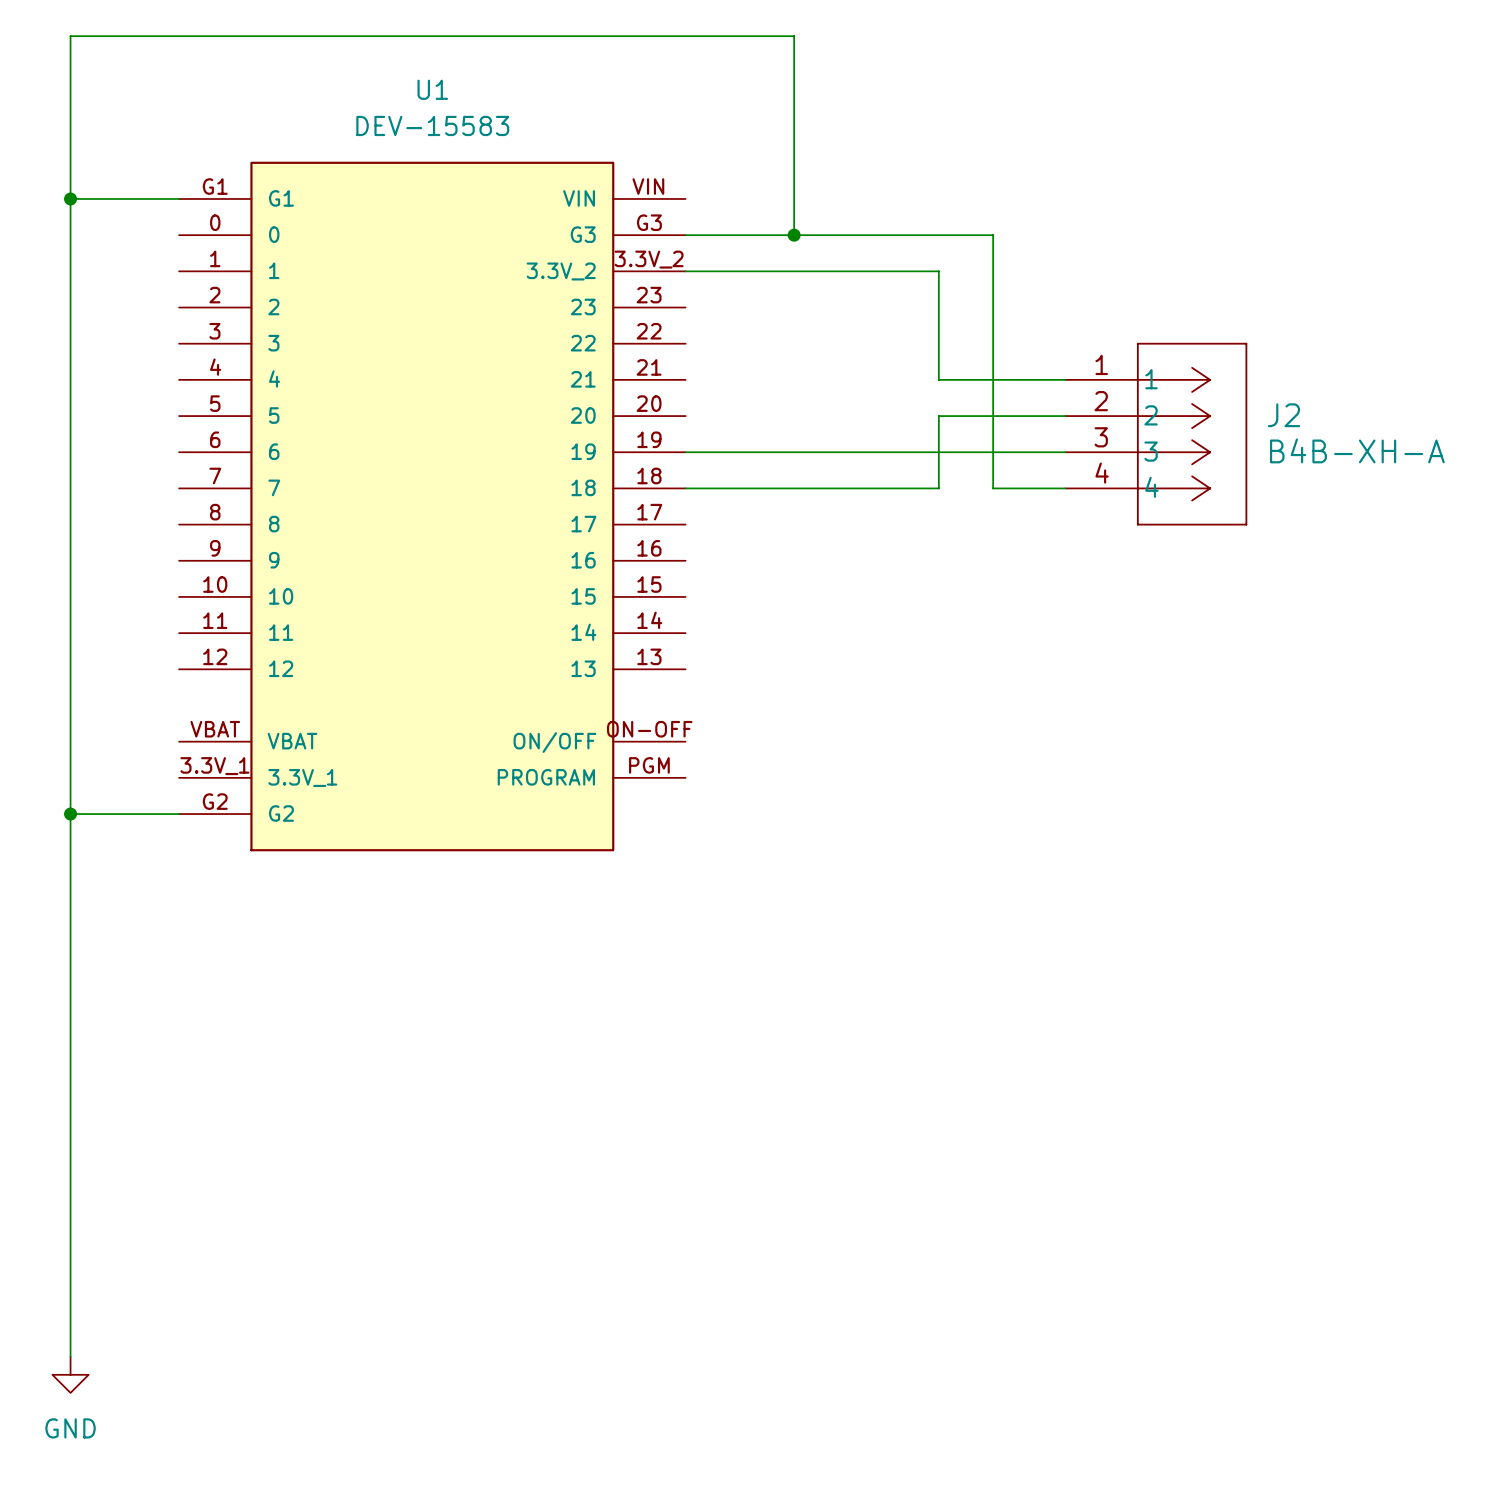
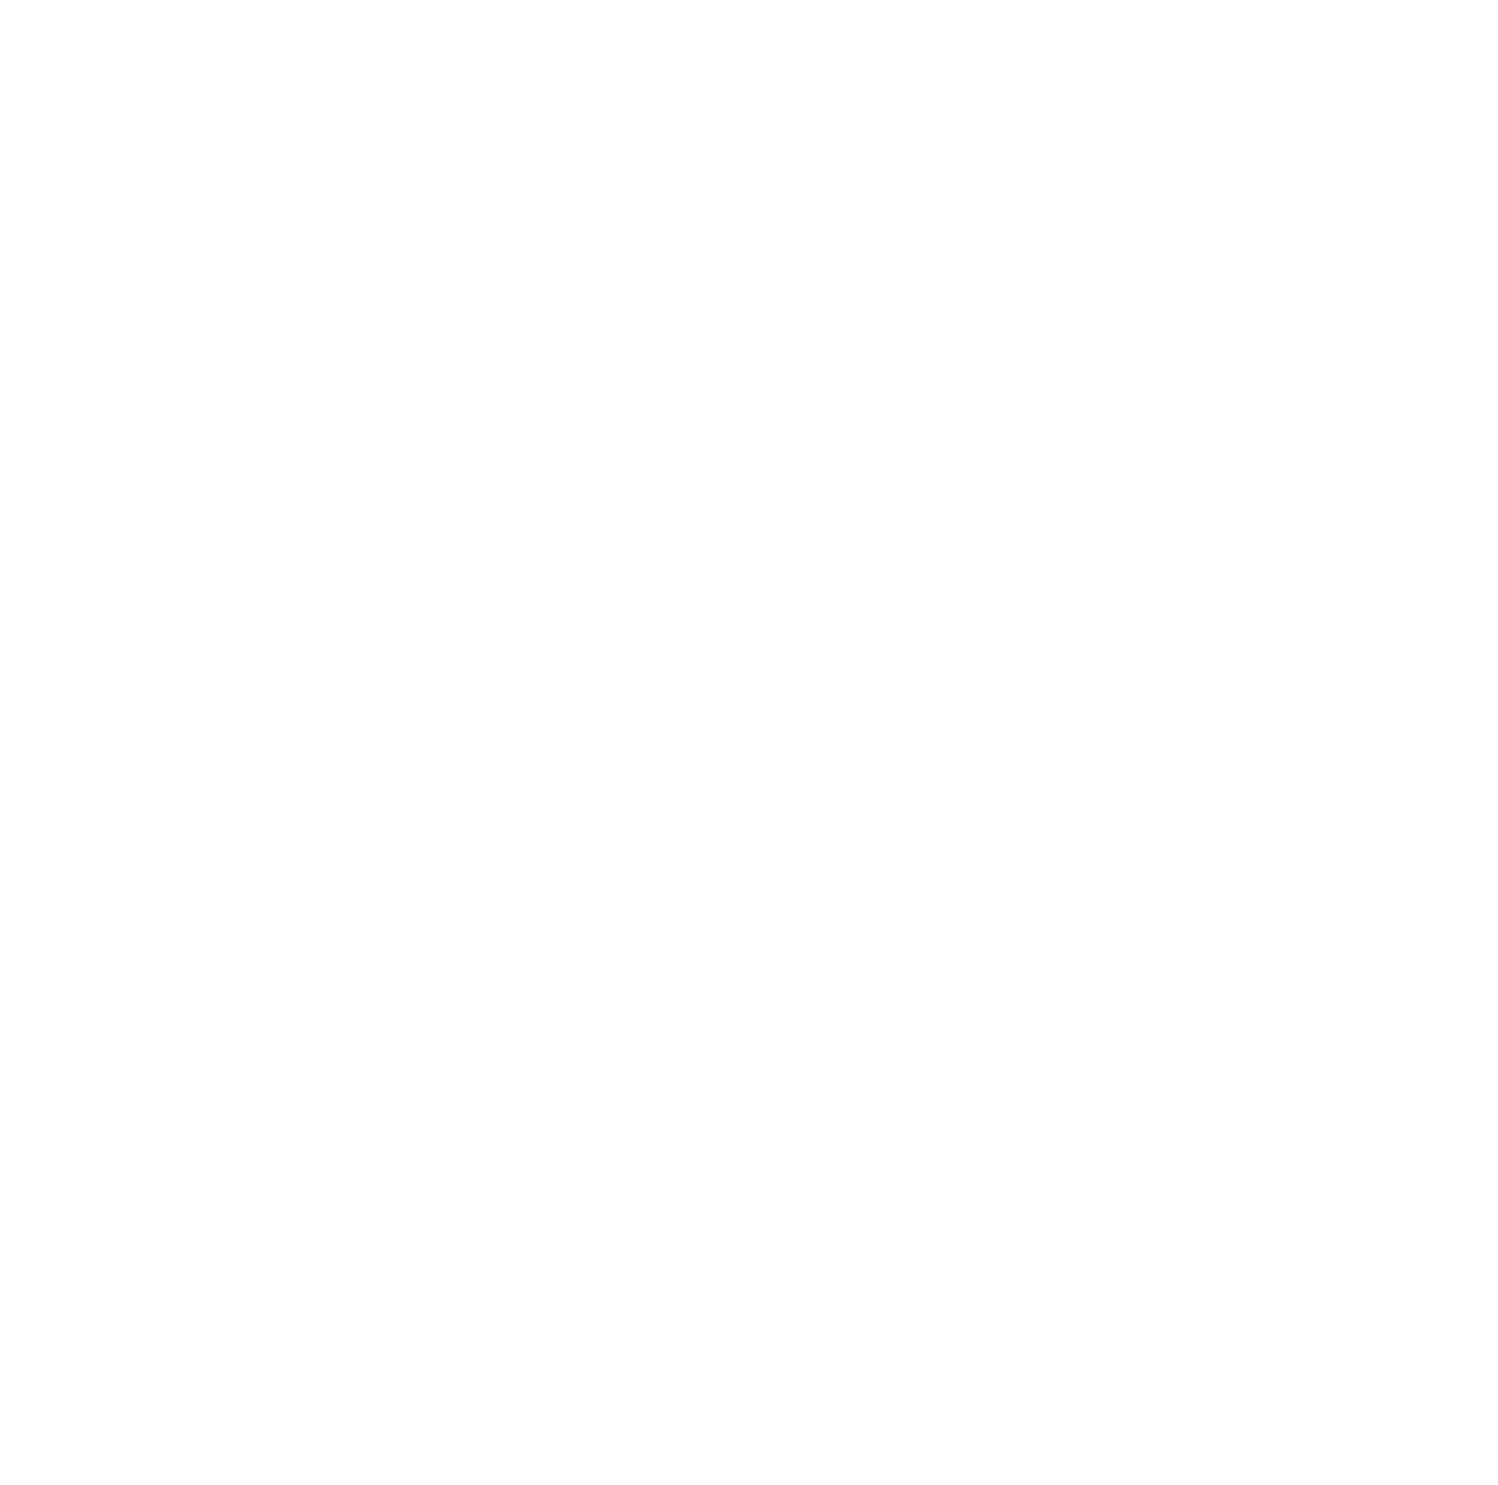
wire: (70, 198) (179, 198) -> none
junction: (70, 198) -> none
wire: (685, 235) (993, 235) (993, 488) (1065, 488) -> none
wire: (794, 235) (794, 36) (70, 36) (70, 1356) -> none
junction: (794, 235) -> none
wire: (685, 271) (938, 271) (938, 379) (1065, 379) -> none
wire: (1065, 416) (938, 416) (938, 488) (685, 488) -> none
J2: B4B-XH-A (1156, 434) -> none
wire: (685, 452) (1065, 452) -> none
U1: DEV-15583 (432, 506) -> none
wire: (70, 814) (179, 814) -> none
junction: (70, 814) -> none
power symbol: GND (70, 1374) -> none

